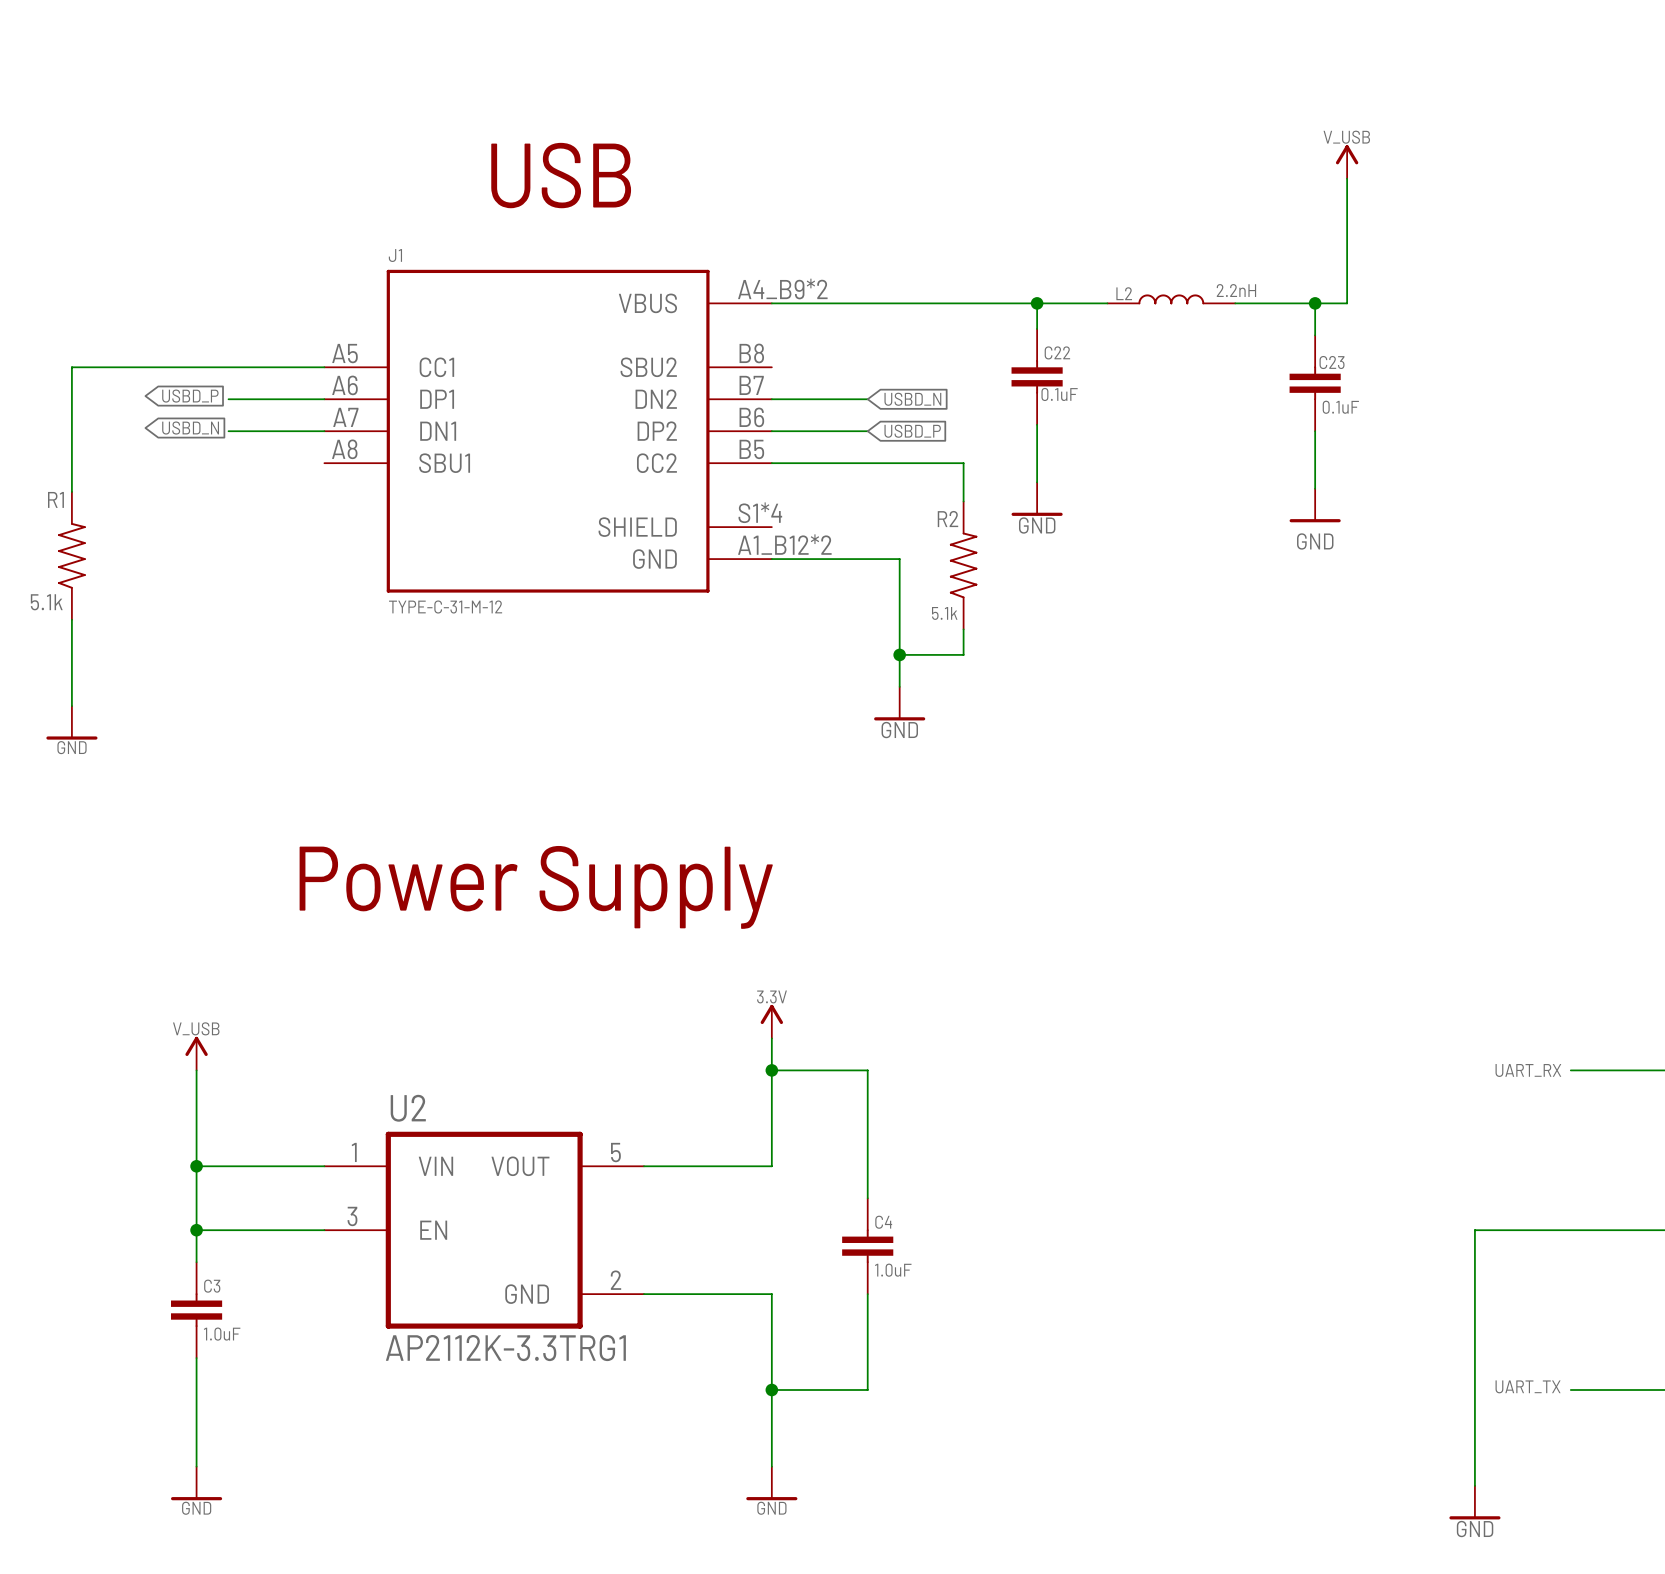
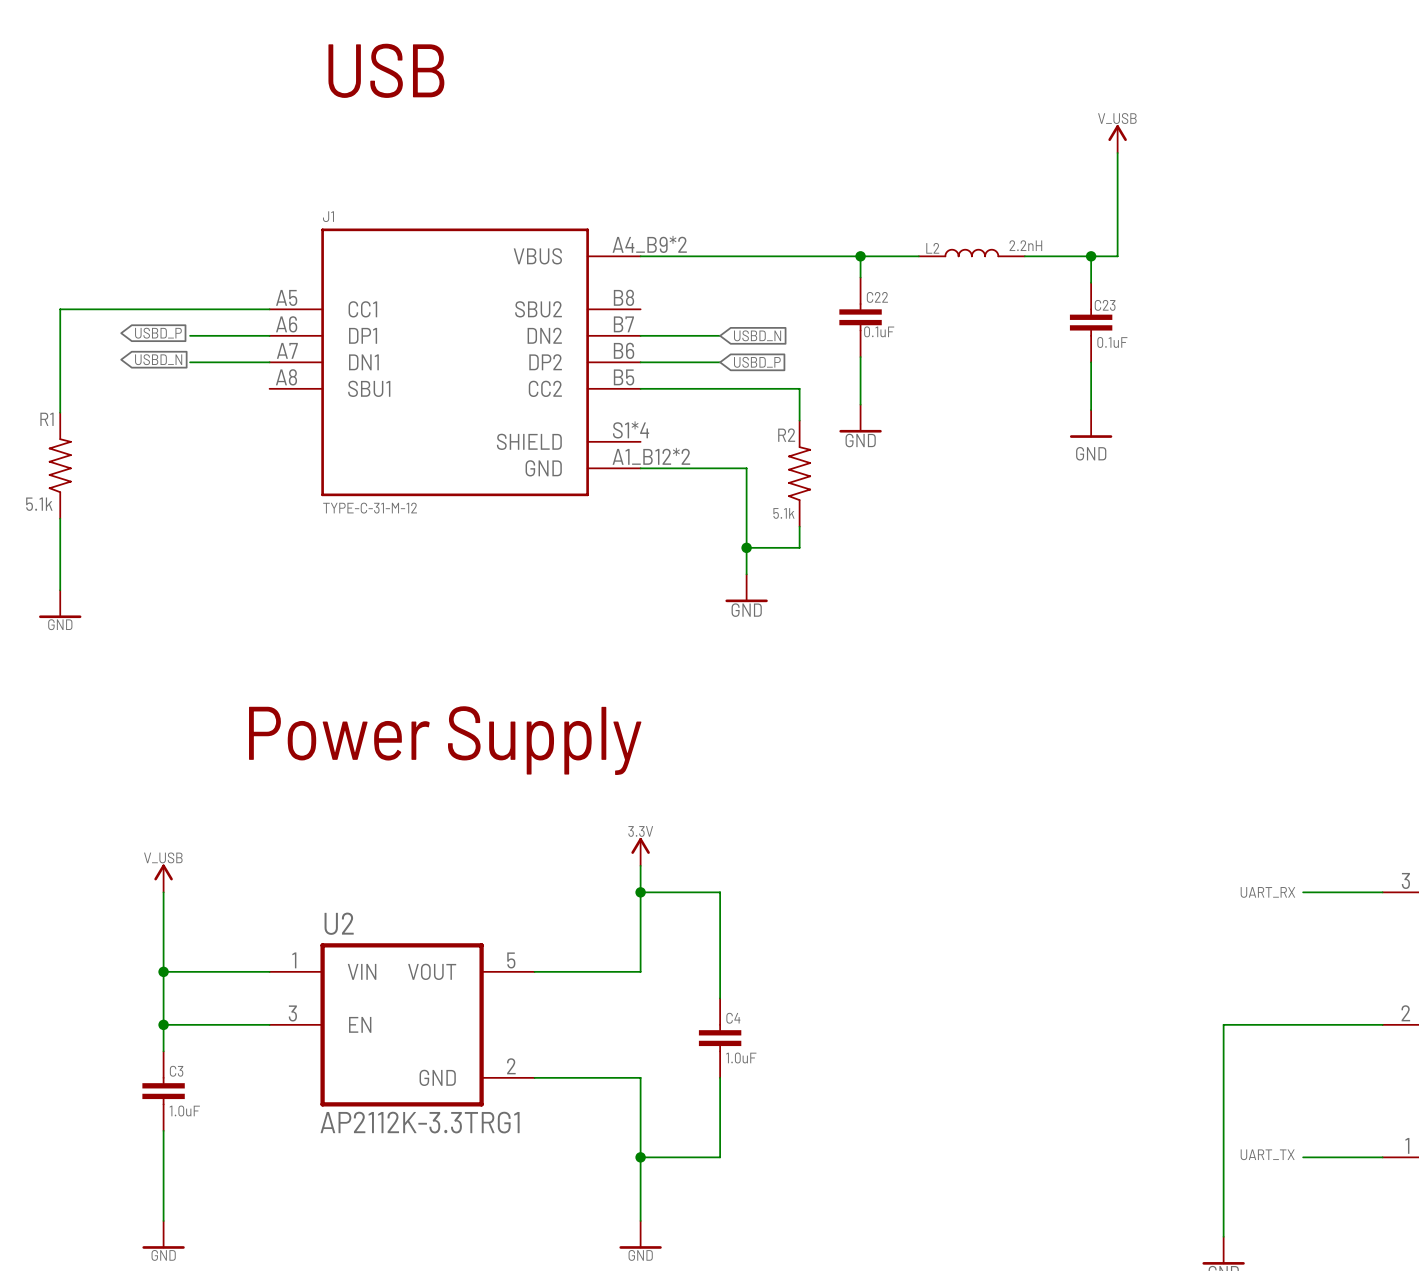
text position: USB (561, 175) -> USB (386, 70)

